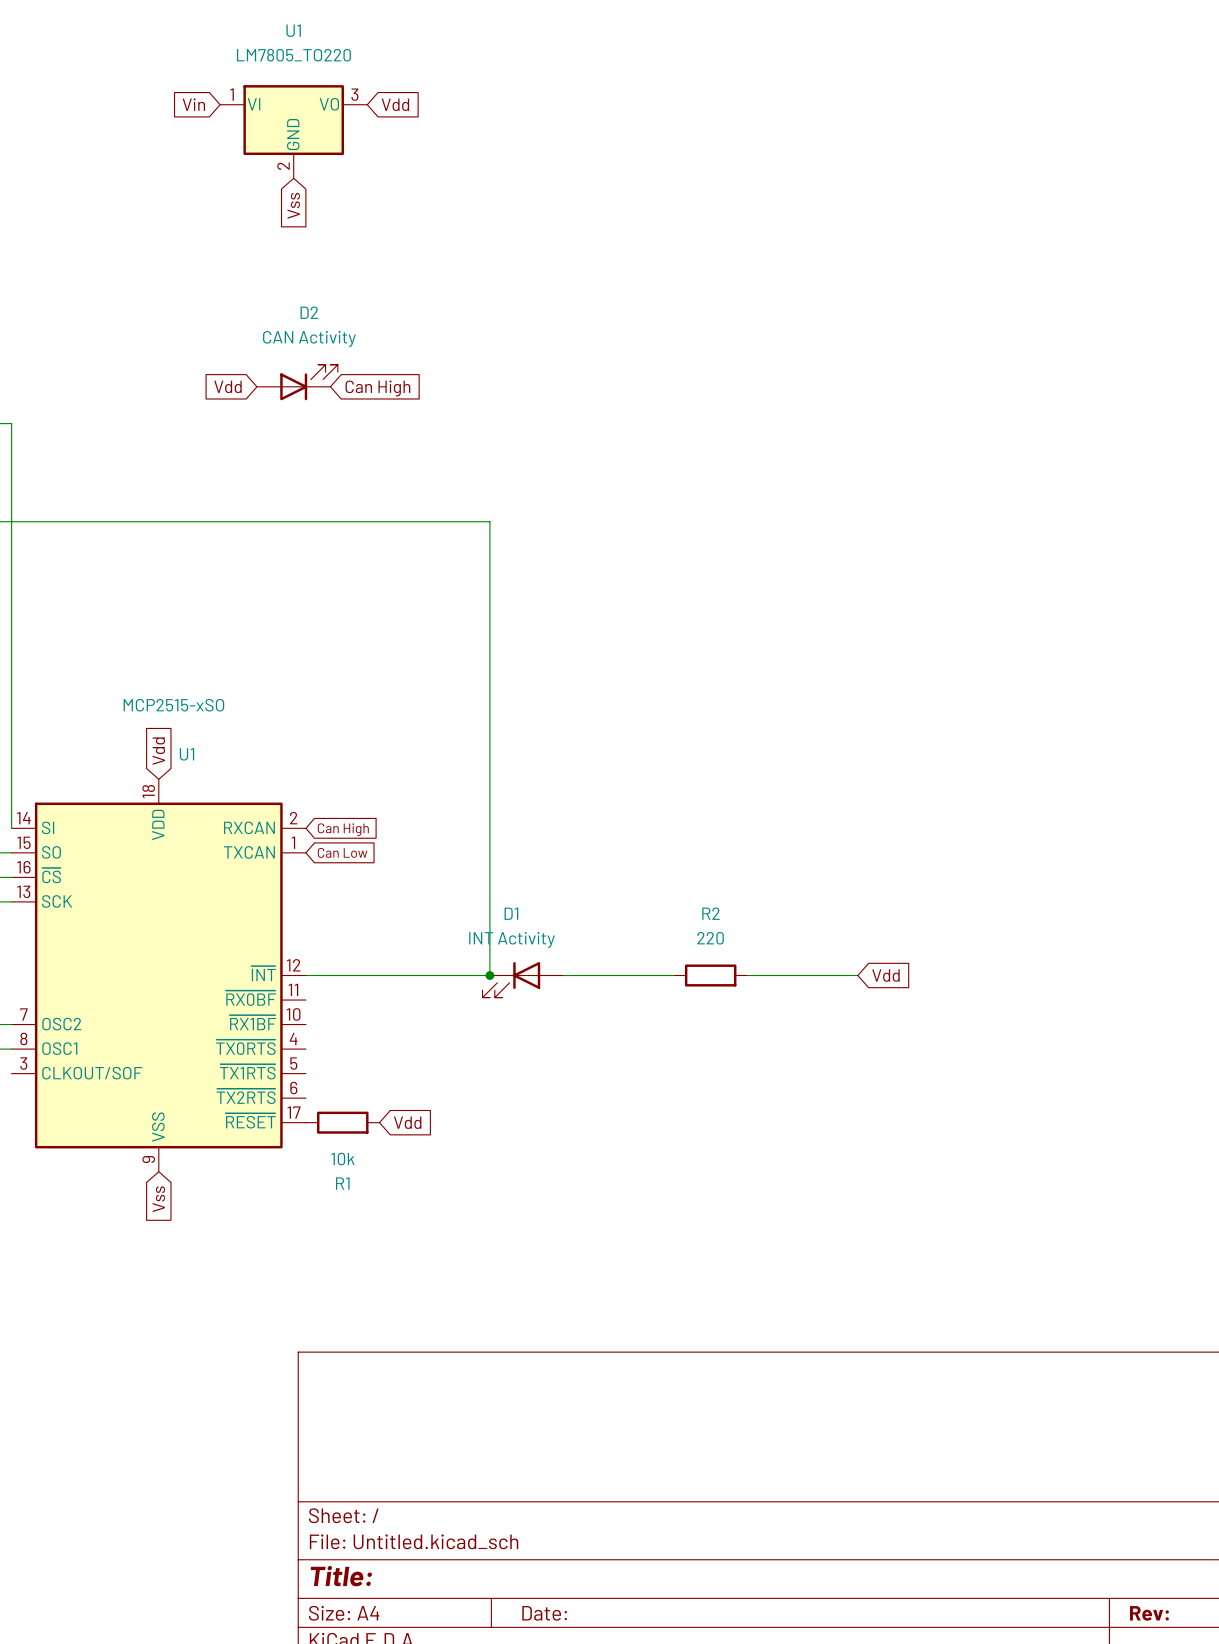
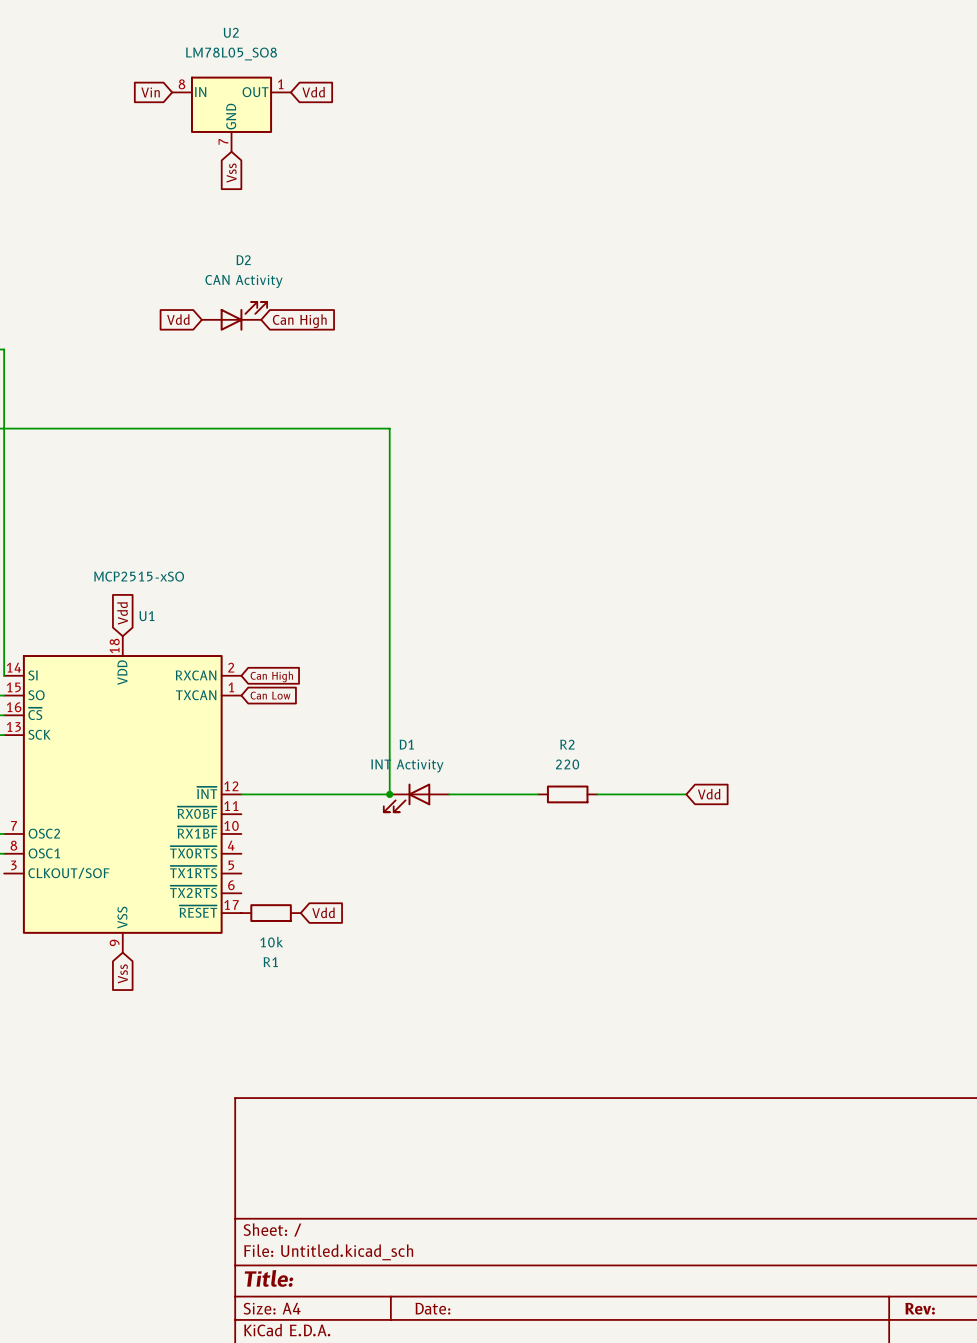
U1 name: U1 (293, 30) -> U2 (231, 32)
U1 value: LM7805_TO220 (293, 55) -> LM78L05_SO8 (231, 53)
U1 pin number: 1 (232, 94) -> 8 (181, 84)
U1 pin number: 3 (354, 94) -> 1 (280, 84)
U1 pin name: VI (254, 104) -> IN (200, 92)
U1 pin name: VO (329, 104) -> OUT (255, 92)
U1 pin number: 2 (283, 166) -> 7 (223, 141)

